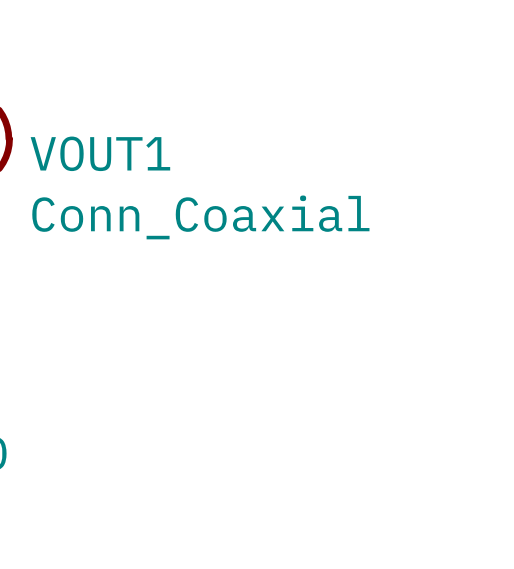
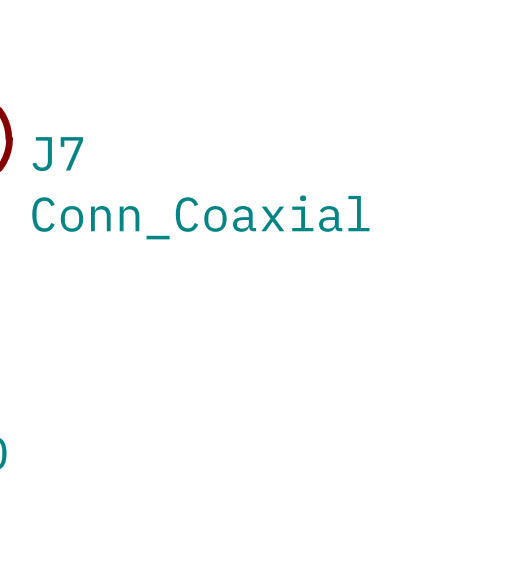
VOUT1 name: VOUT1 (100, 153) -> J7 (57, 154)

